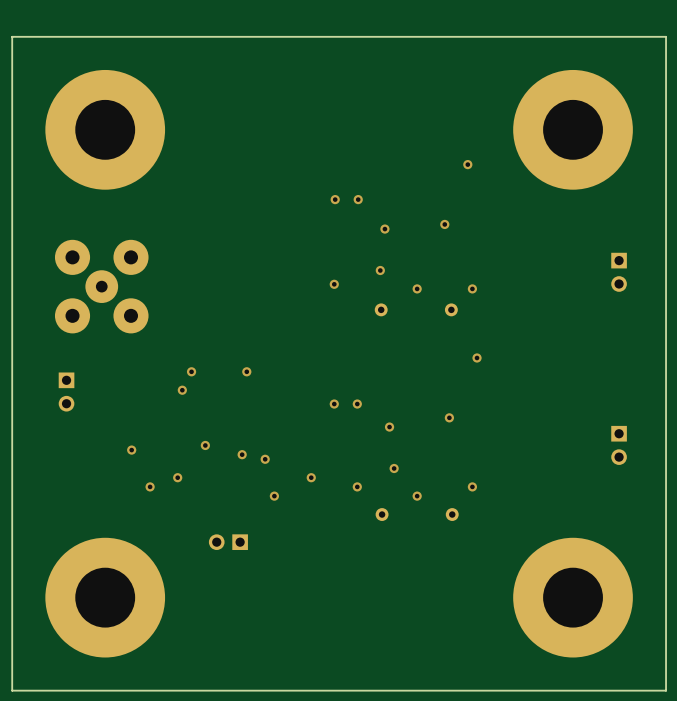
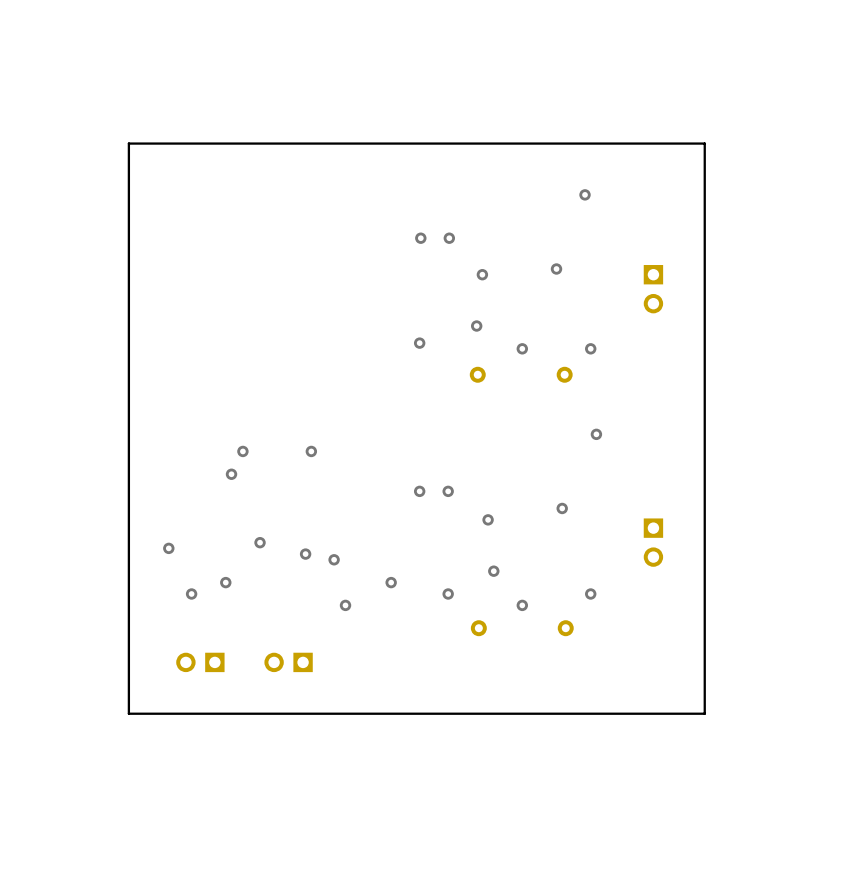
board edge: (666, 36) (12, 36) (12, 690) (666, 690) (666, 36) -> (704, 143) (704, 713) (128, 713) (128, 143) (704, 143)
part: (105, 129) -> none
part: (573, 129) -> none
part: none -> (653, 289)
part: (619, 272) -> none
part: (101, 286) -> none
part rotation: 0° (66, 392) -> 90° clockwise (200, 662)
part position: (66, 392) -> (200, 662)
part position: (619, 445) -> (653, 542)
part: (105, 597) -> none
part: (573, 597) -> none

